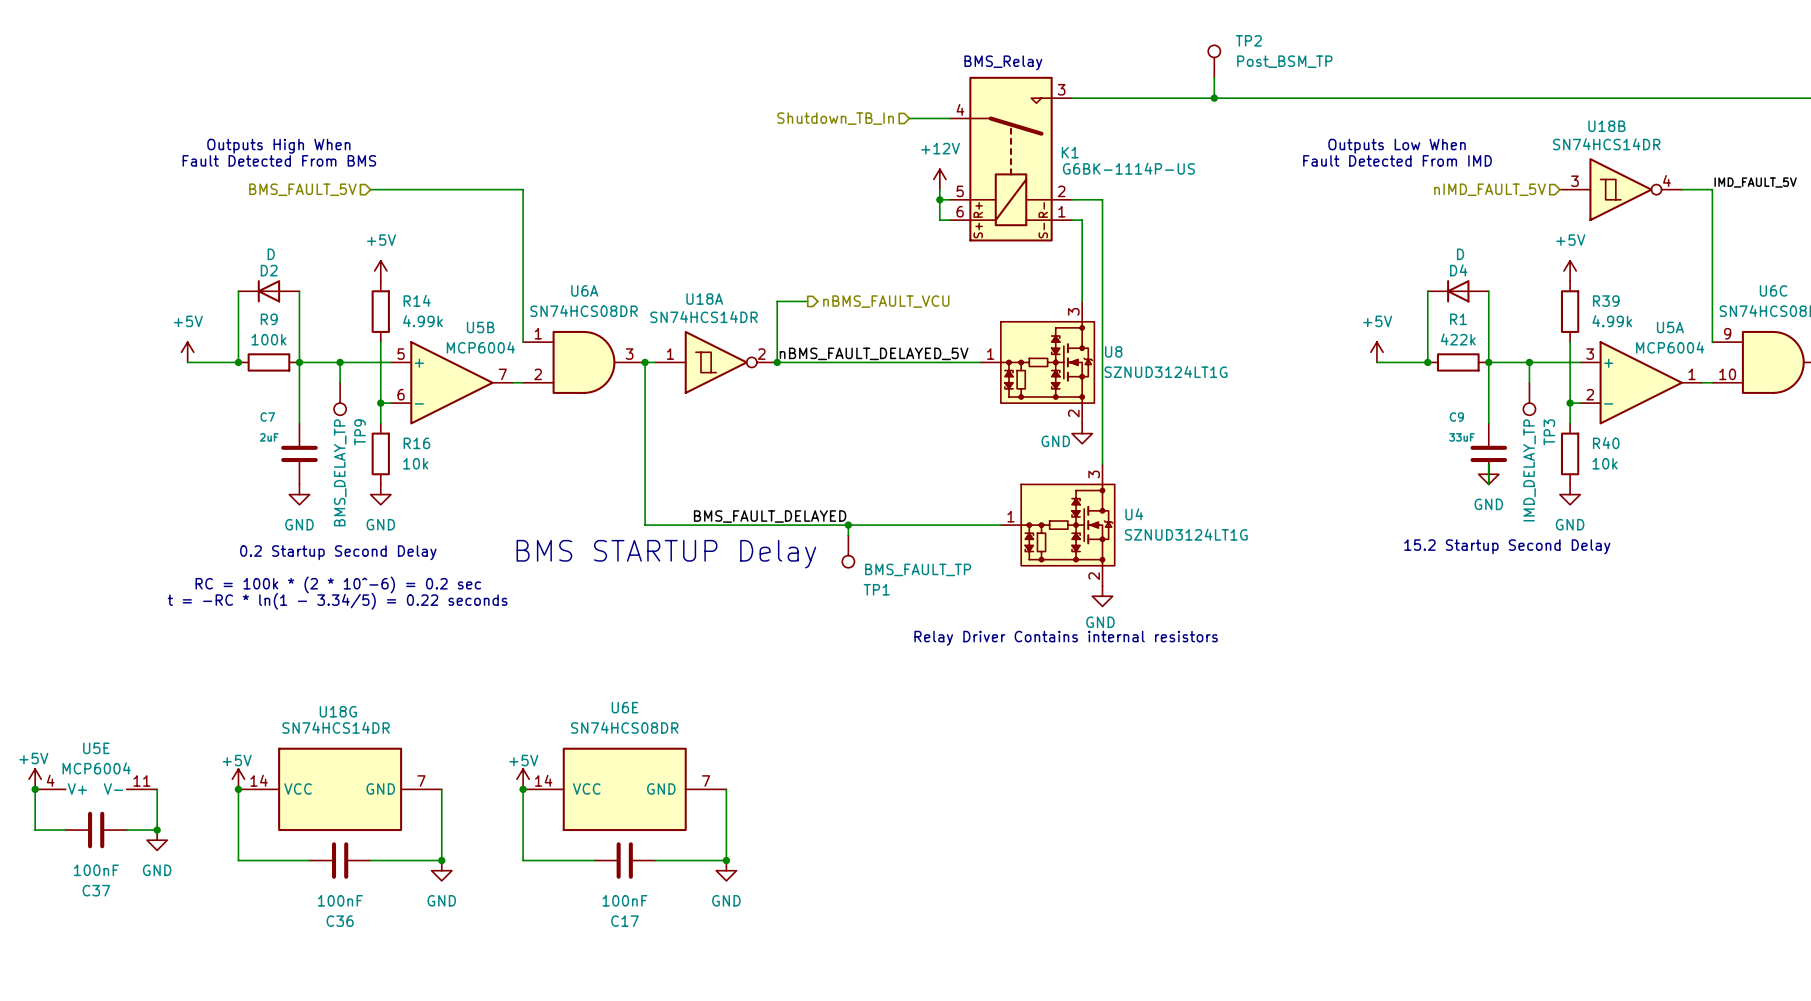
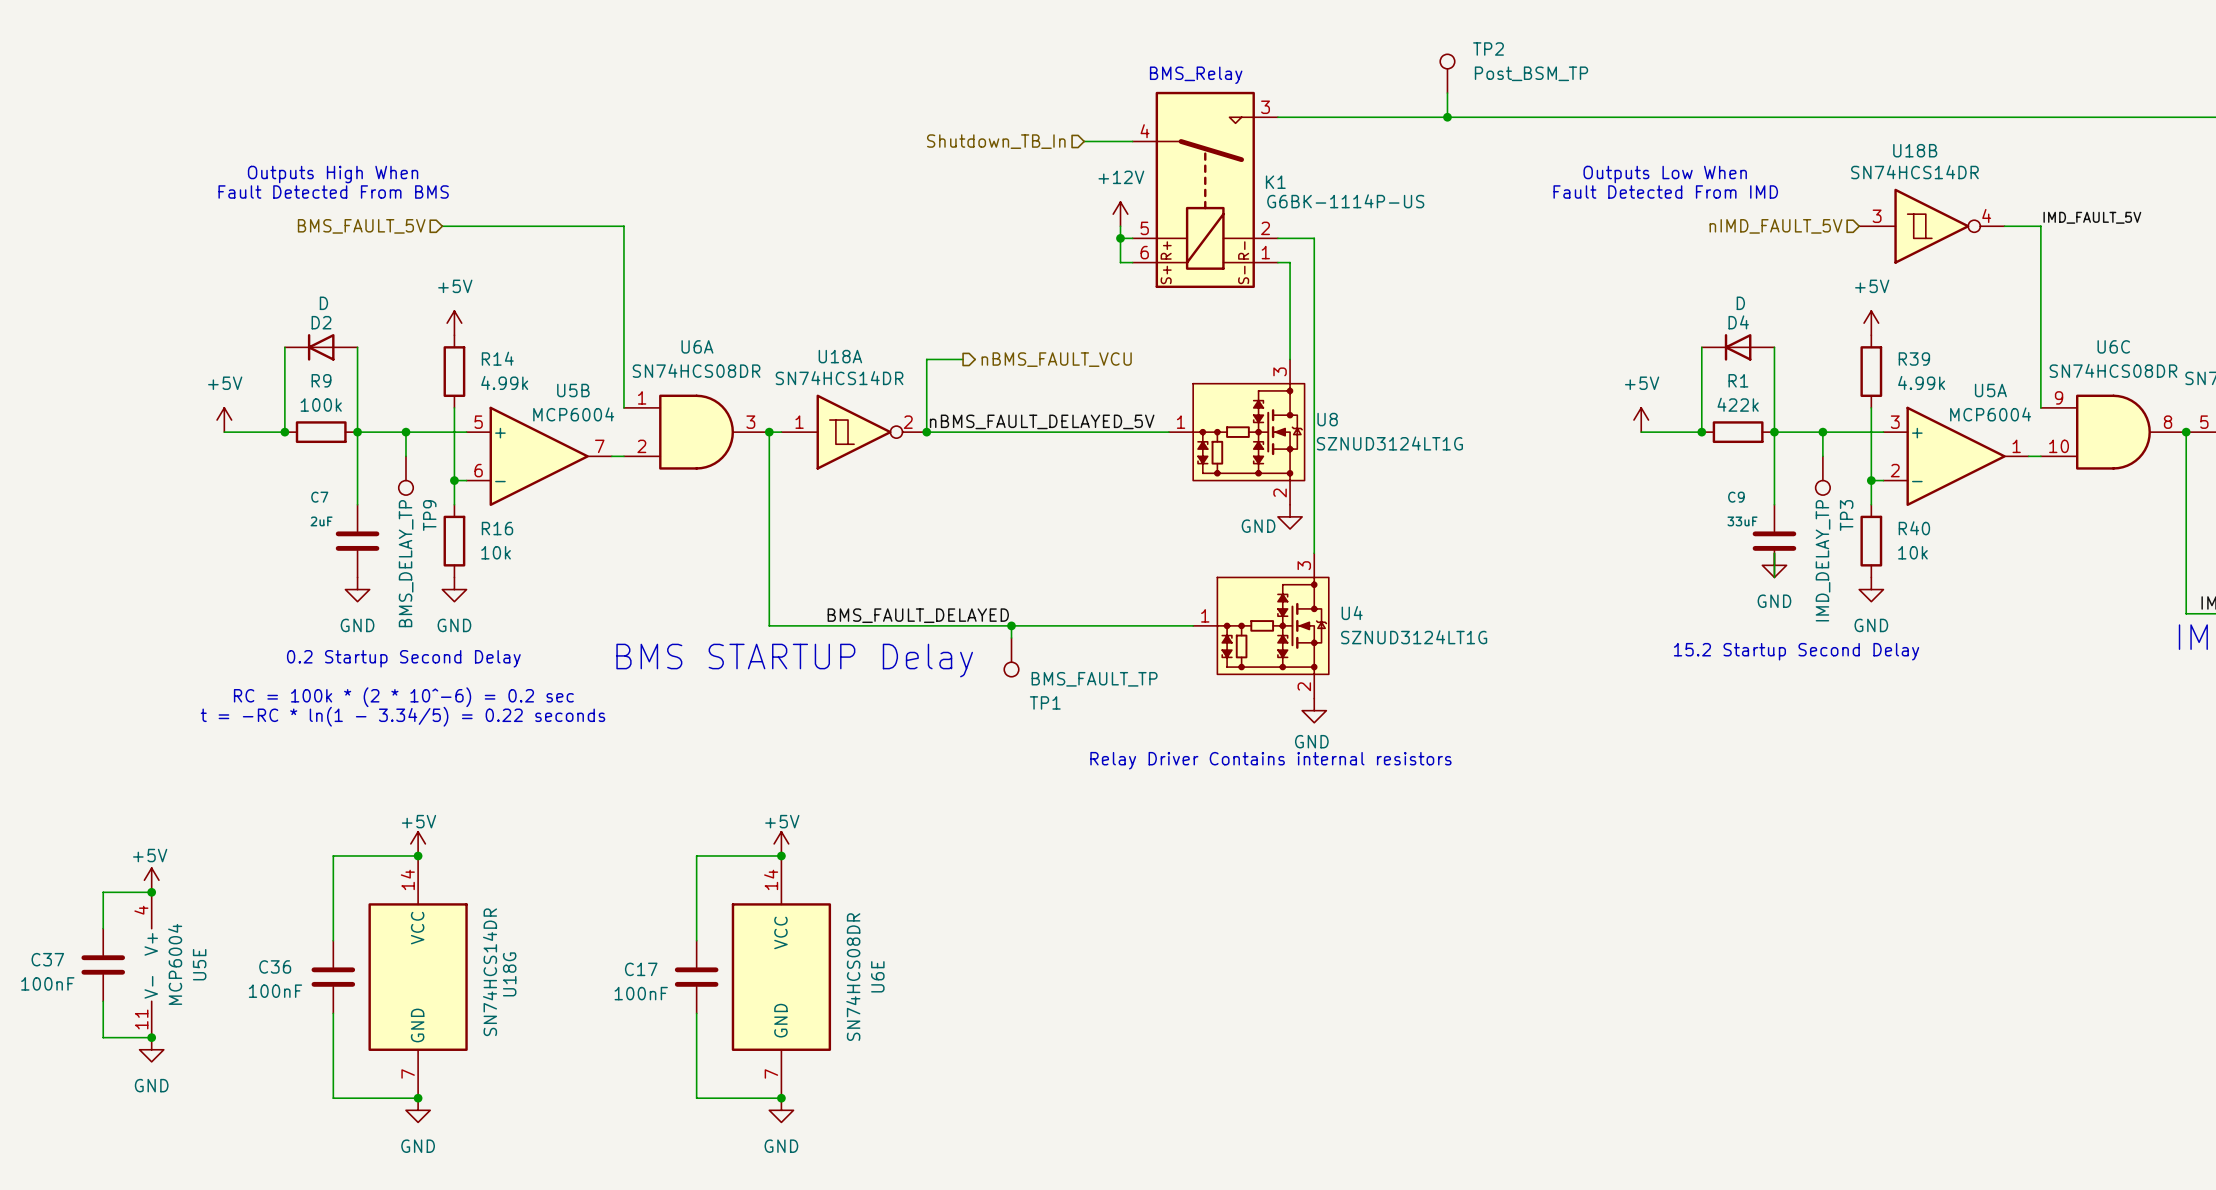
power symbol: none -> +5V (418, 843)
power symbol: none -> +5V (781, 843)
wire: none -> (418, 855) (333, 855) (333, 940)
junction: none -> (418, 855)
wire: none -> (781, 855) (696, 855) (696, 940)
junction: none -> (781, 855)
power symbol: none -> +5V (151, 880)
wire: none -> (151, 892) (103, 892) (103, 928)
junction: none -> (151, 892)
power symbol: +5V (35, 779) -> none
power symbol: +5V (238, 779) -> none
power symbol: +5V (523, 779) -> none
wire: (35, 789) (35, 830) (65, 830) -> none
junction: (35, 789) -> none
U5E rotation: 0° (96, 789) -> 90° clockwise (151, 964)
wire: (157, 789) (157, 830) (126, 830) -> none
wire: (238, 789) (238, 860) (309, 860) -> (333, 1013) (333, 1098) (418, 1098)
junction: (238, 789) -> none
U18G rotation: 0° (340, 789) -> 90° clockwise (418, 977)
wire: (441, 789) (441, 860) (370, 860) -> none
wire: (523, 789) (523, 860) (594, 860) -> (696, 1013) (696, 1098) (781, 1098)
junction: (523, 789) -> none
U6E rotation: 0° (624, 789) -> 90° clockwise (781, 977)
wire: (726, 789) (726, 860) (655, 860) -> none
C37 rotation: 0° (96, 830) -> 90° clockwise (103, 964)
junction: (157, 830) -> none
wire: none -> (103, 1001) (103, 1037) (151, 1037)
power symbol position: GND (157, 840) -> GND (151, 1049)
C36 rotation: 0° (340, 860) -> 90° clockwise (333, 977)
C36 position: (340, 860) -> (333, 977)
junction: (441, 860) -> none
C17 rotation: 0° (624, 860) -> 90° clockwise (696, 977)
C17 position: (624, 860) -> (696, 977)
junction: (726, 860) -> none
C37 value position: 100nF (96, 870) -> 100nF (47, 983)
junction: none -> (151, 1037)
power symbol: GND (441, 870) -> none
power symbol position: GND (726, 870) -> GND (781, 1110)
junction: none -> (418, 1098)
junction: none -> (781, 1098)
power symbol: none -> GND (418, 1110)

